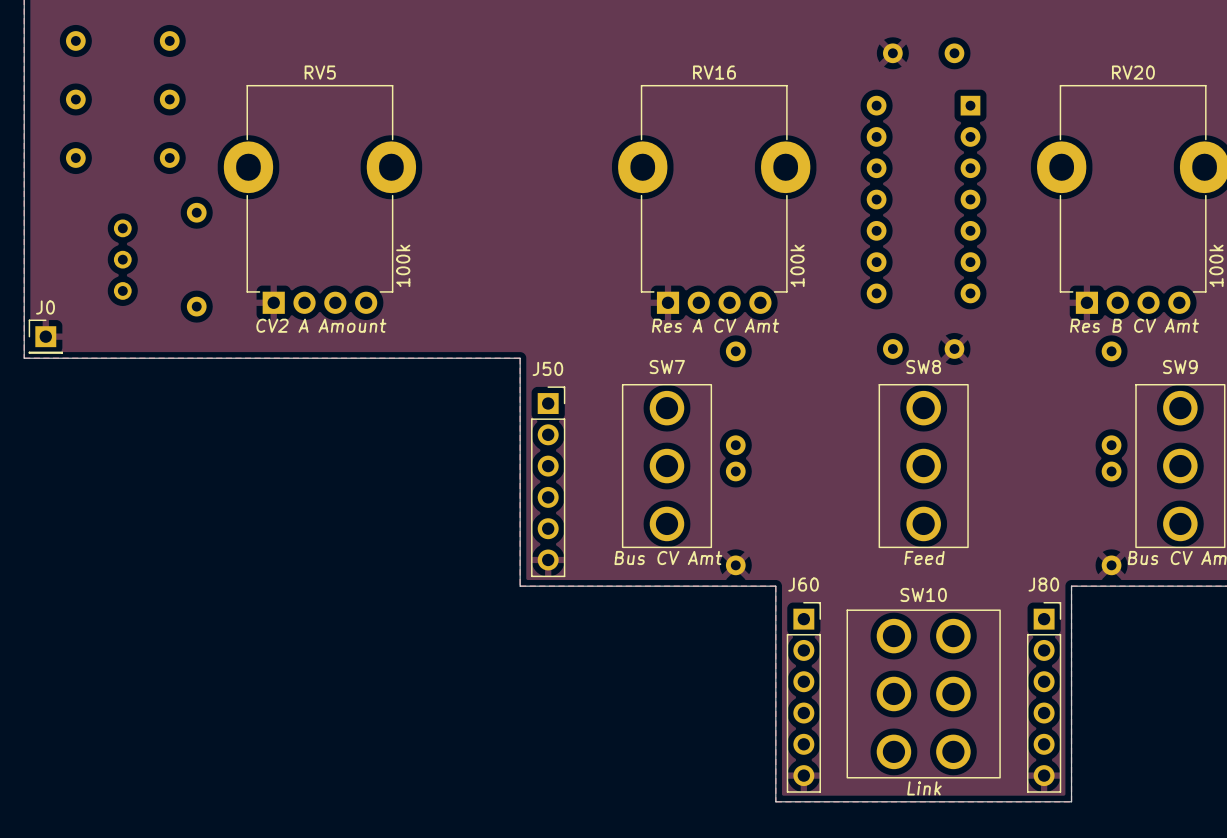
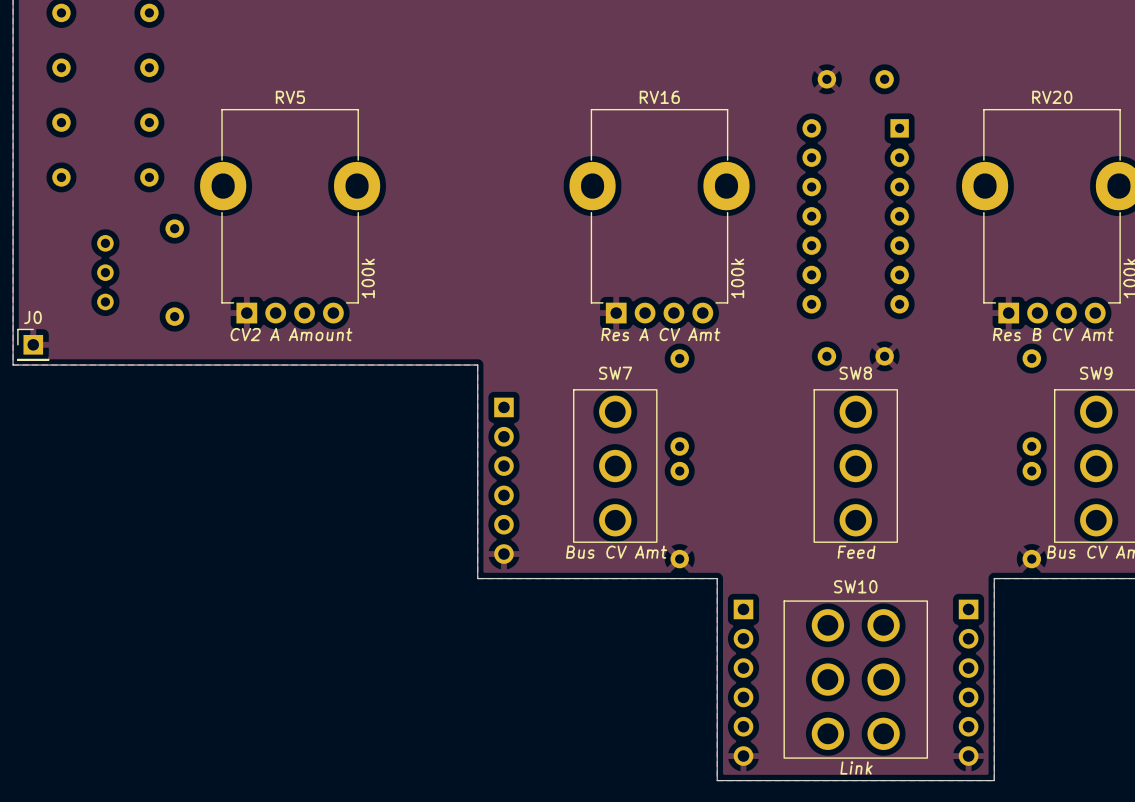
J50 side: top (548, 481) -> bottom (503, 480)
J60 side: top (803, 697) -> bottom (743, 682)
J80 side: top (1044, 697) -> bottom (968, 682)

